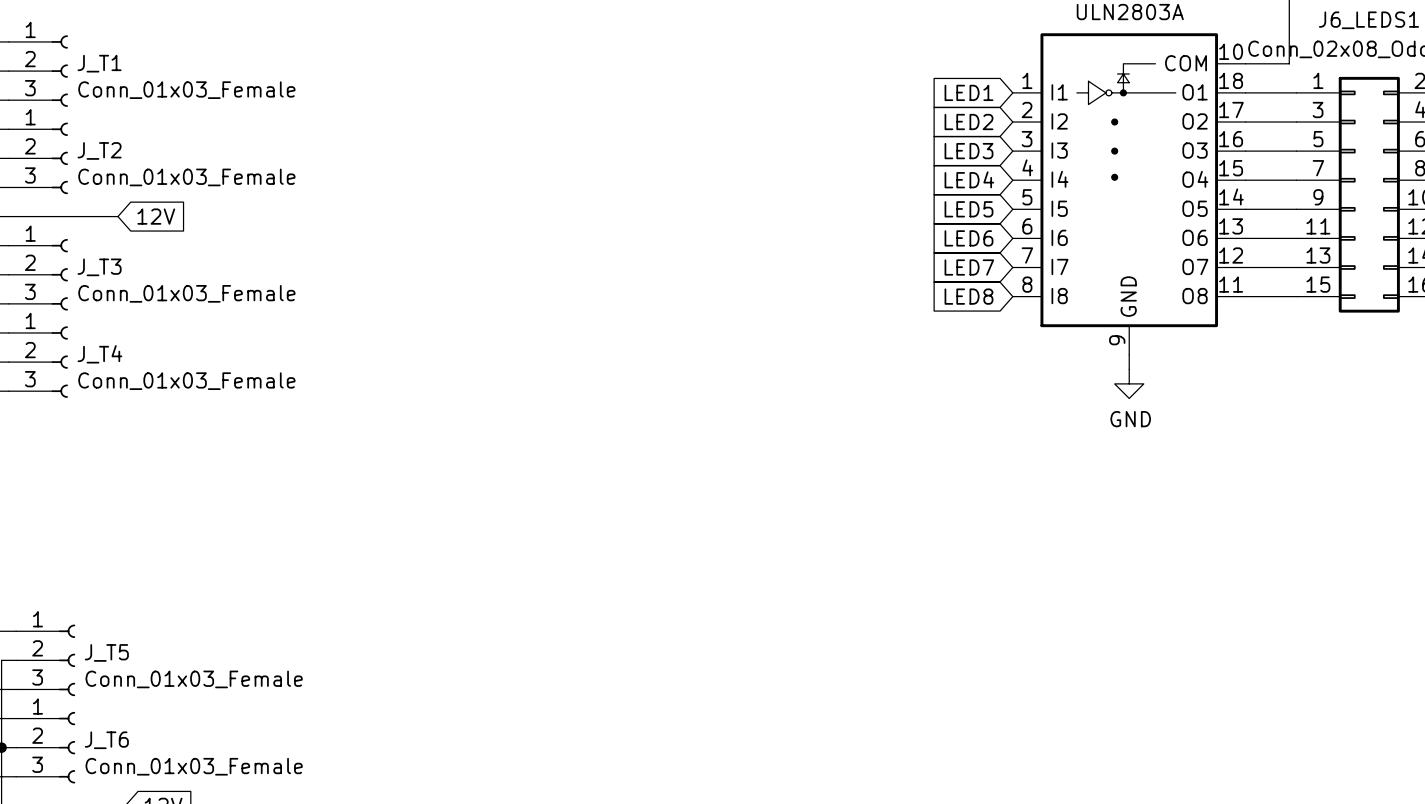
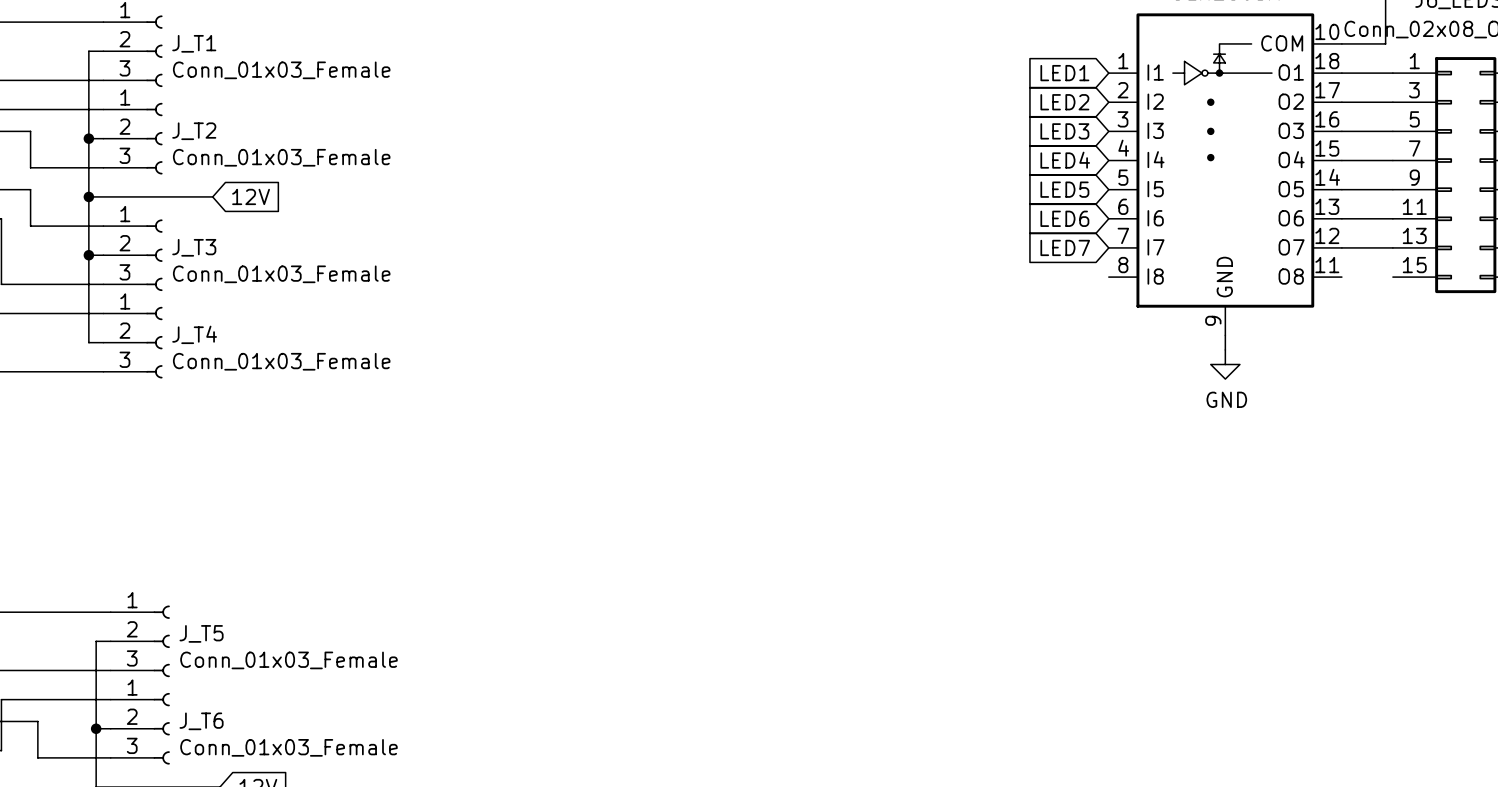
global label: LED8 (968, 296) -> none
wire: (1245, 296) (1296, 296) -> none

